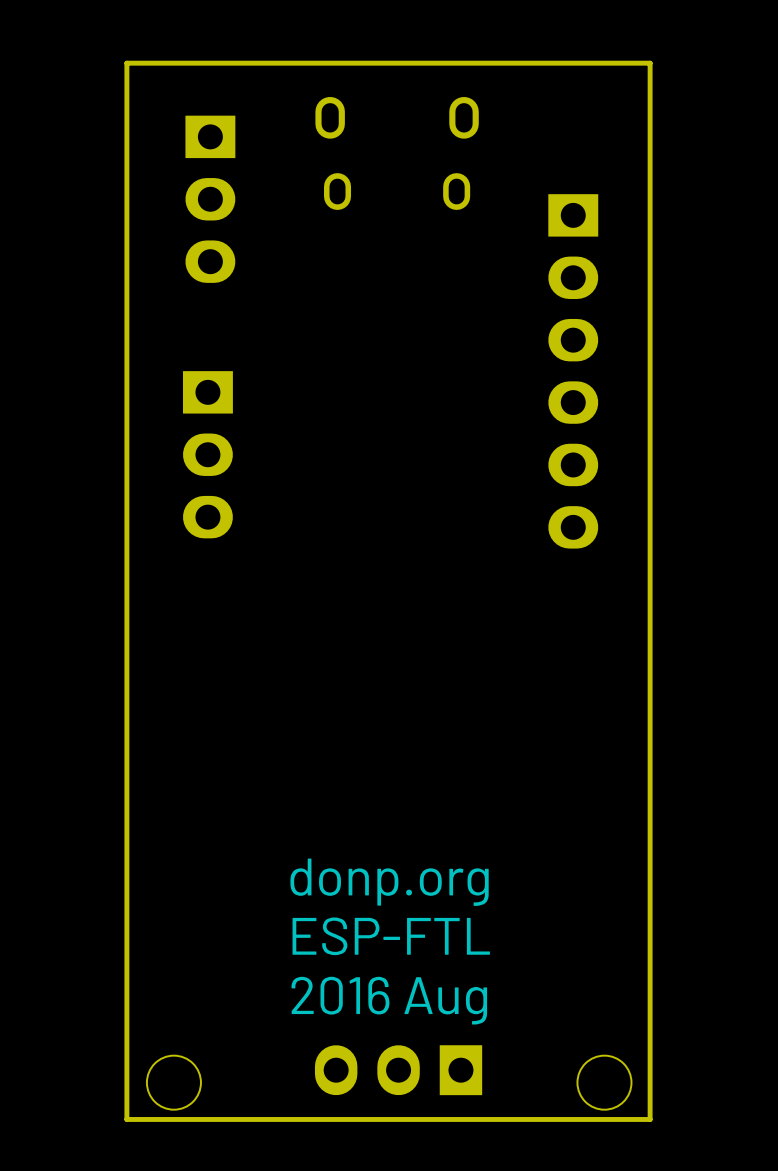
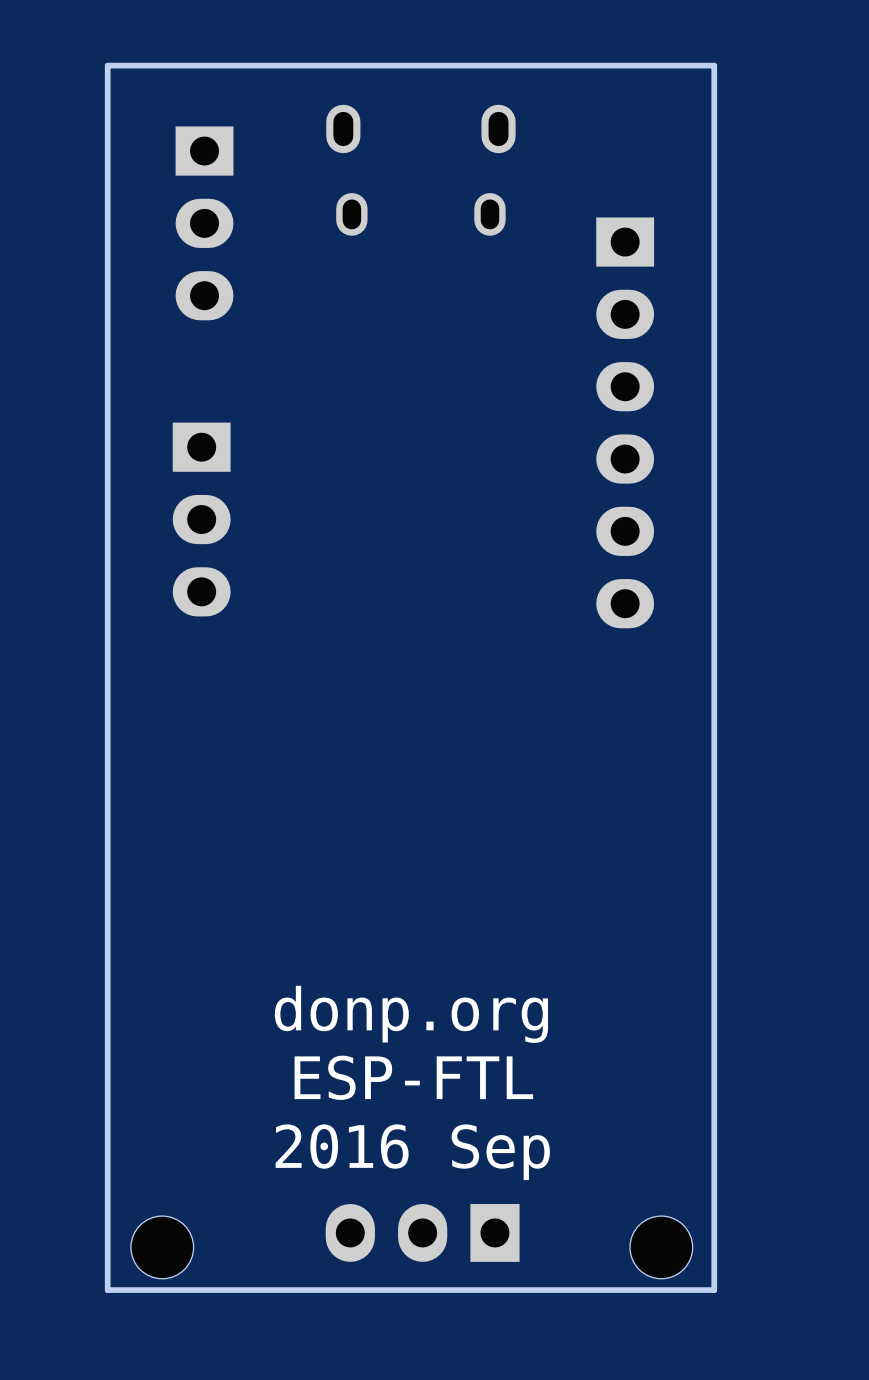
text: 2016 Aug (389, 1000) -> 2016 Sep (412, 1152)

